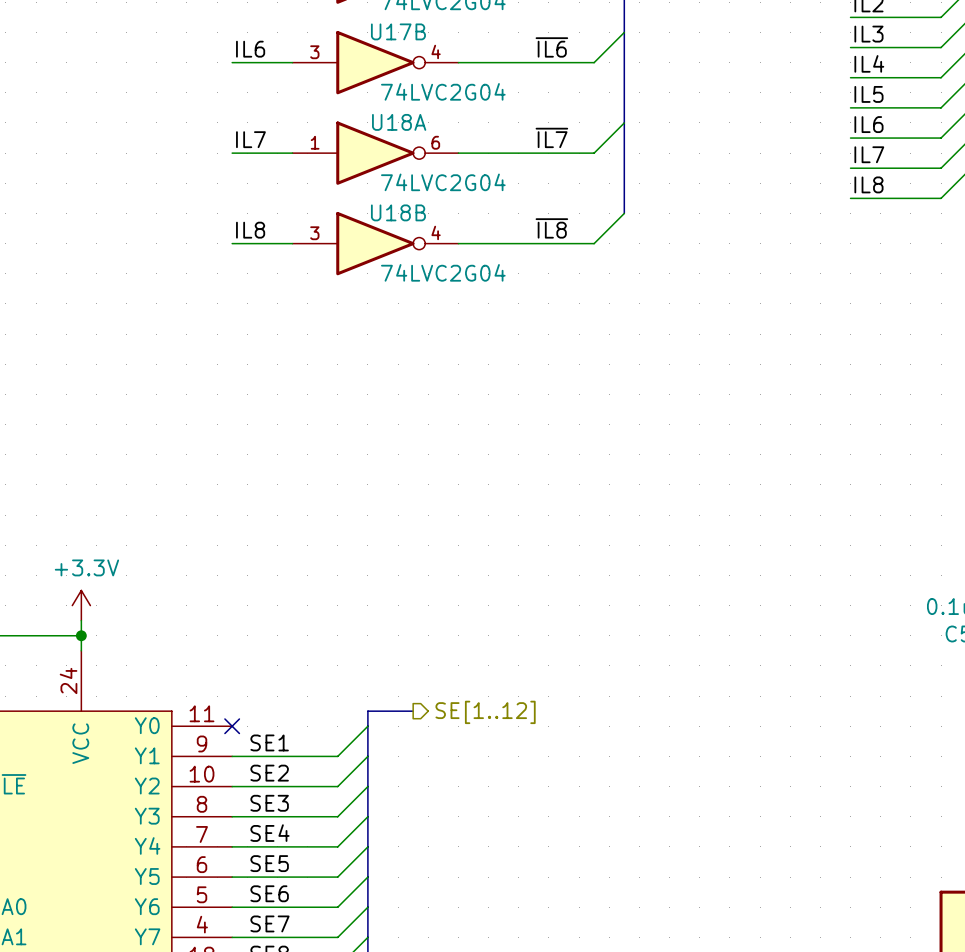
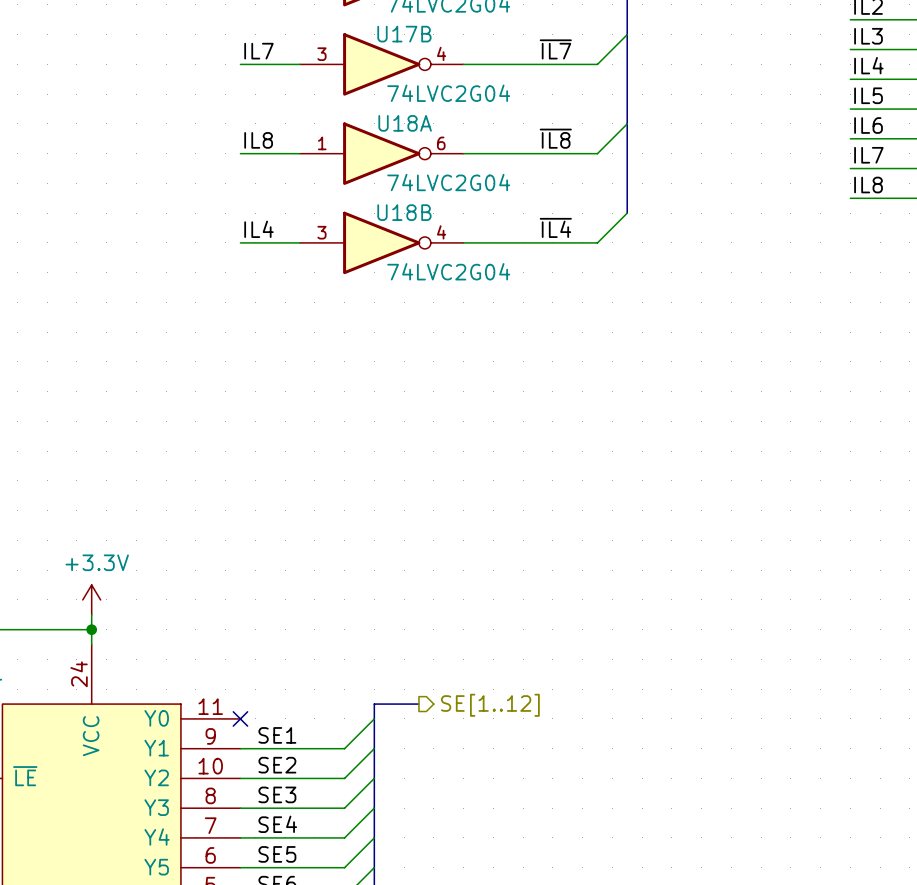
label: ~{IL6} (551, 47) -> ~{IL7} (555, 49)
label: IL6 (250, 49) -> IL7 (258, 51)
label: ~{IL7} (551, 137) -> ~{IL8} (555, 138)
label: IL7 (250, 139) -> IL8 (258, 140)
label: ~{IL8} (551, 228) -> ~{IL4} (555, 227)
label: IL8 (250, 230) -> IL4 (258, 229)

